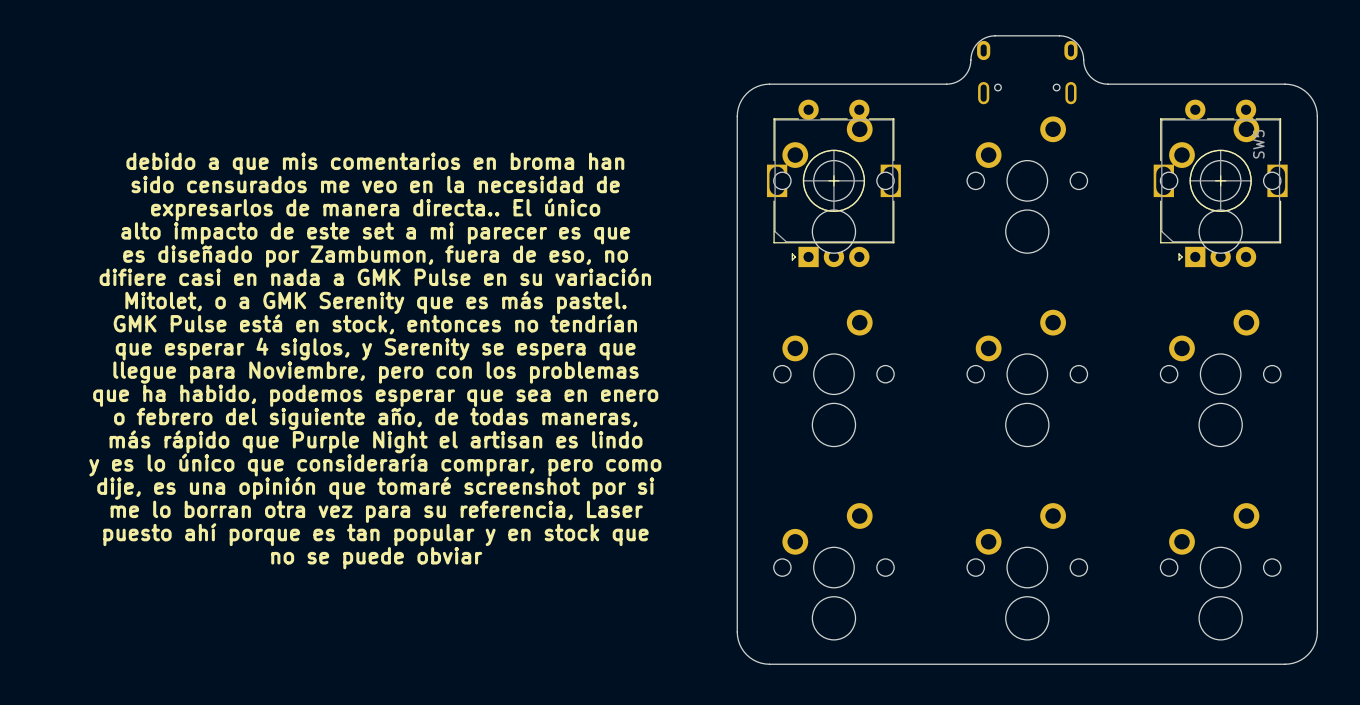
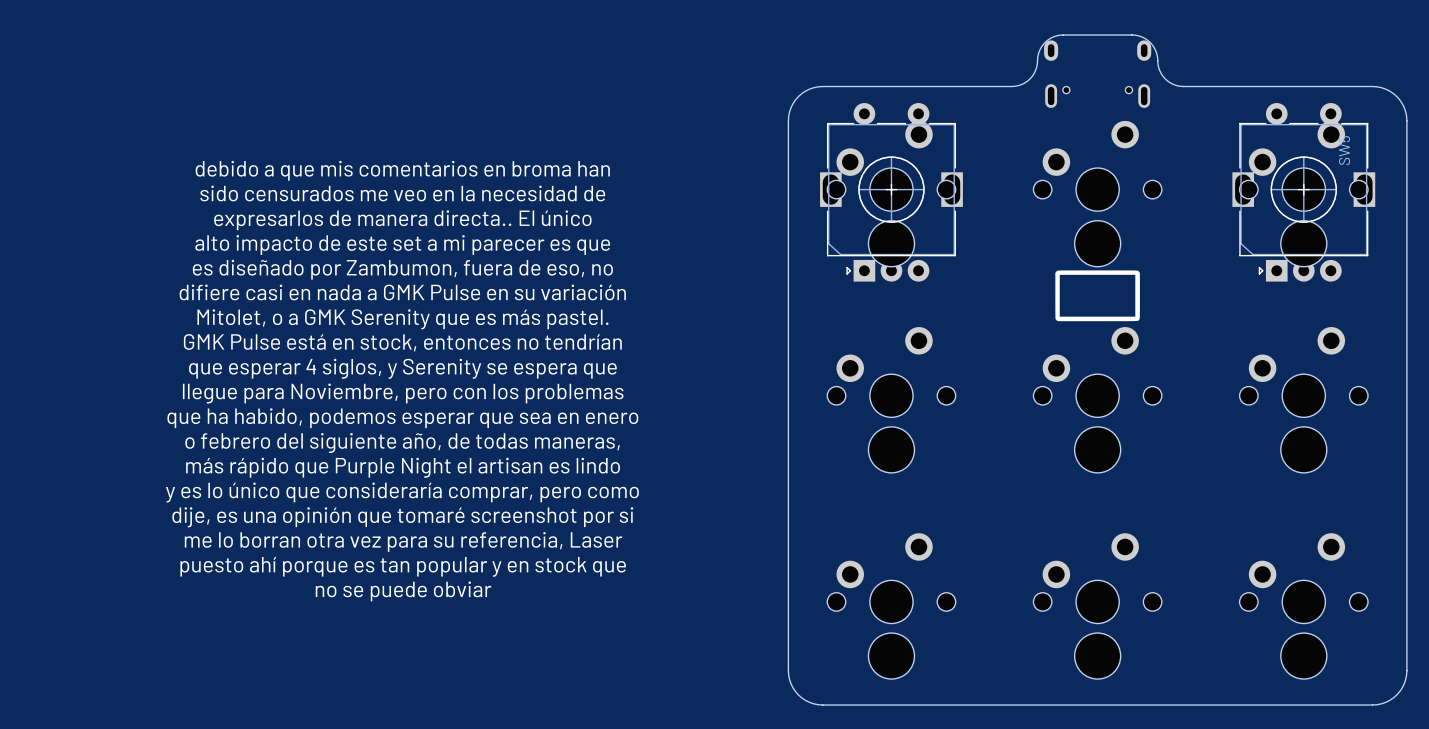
drawing: none -> [1055, 270, 1140, 322]

